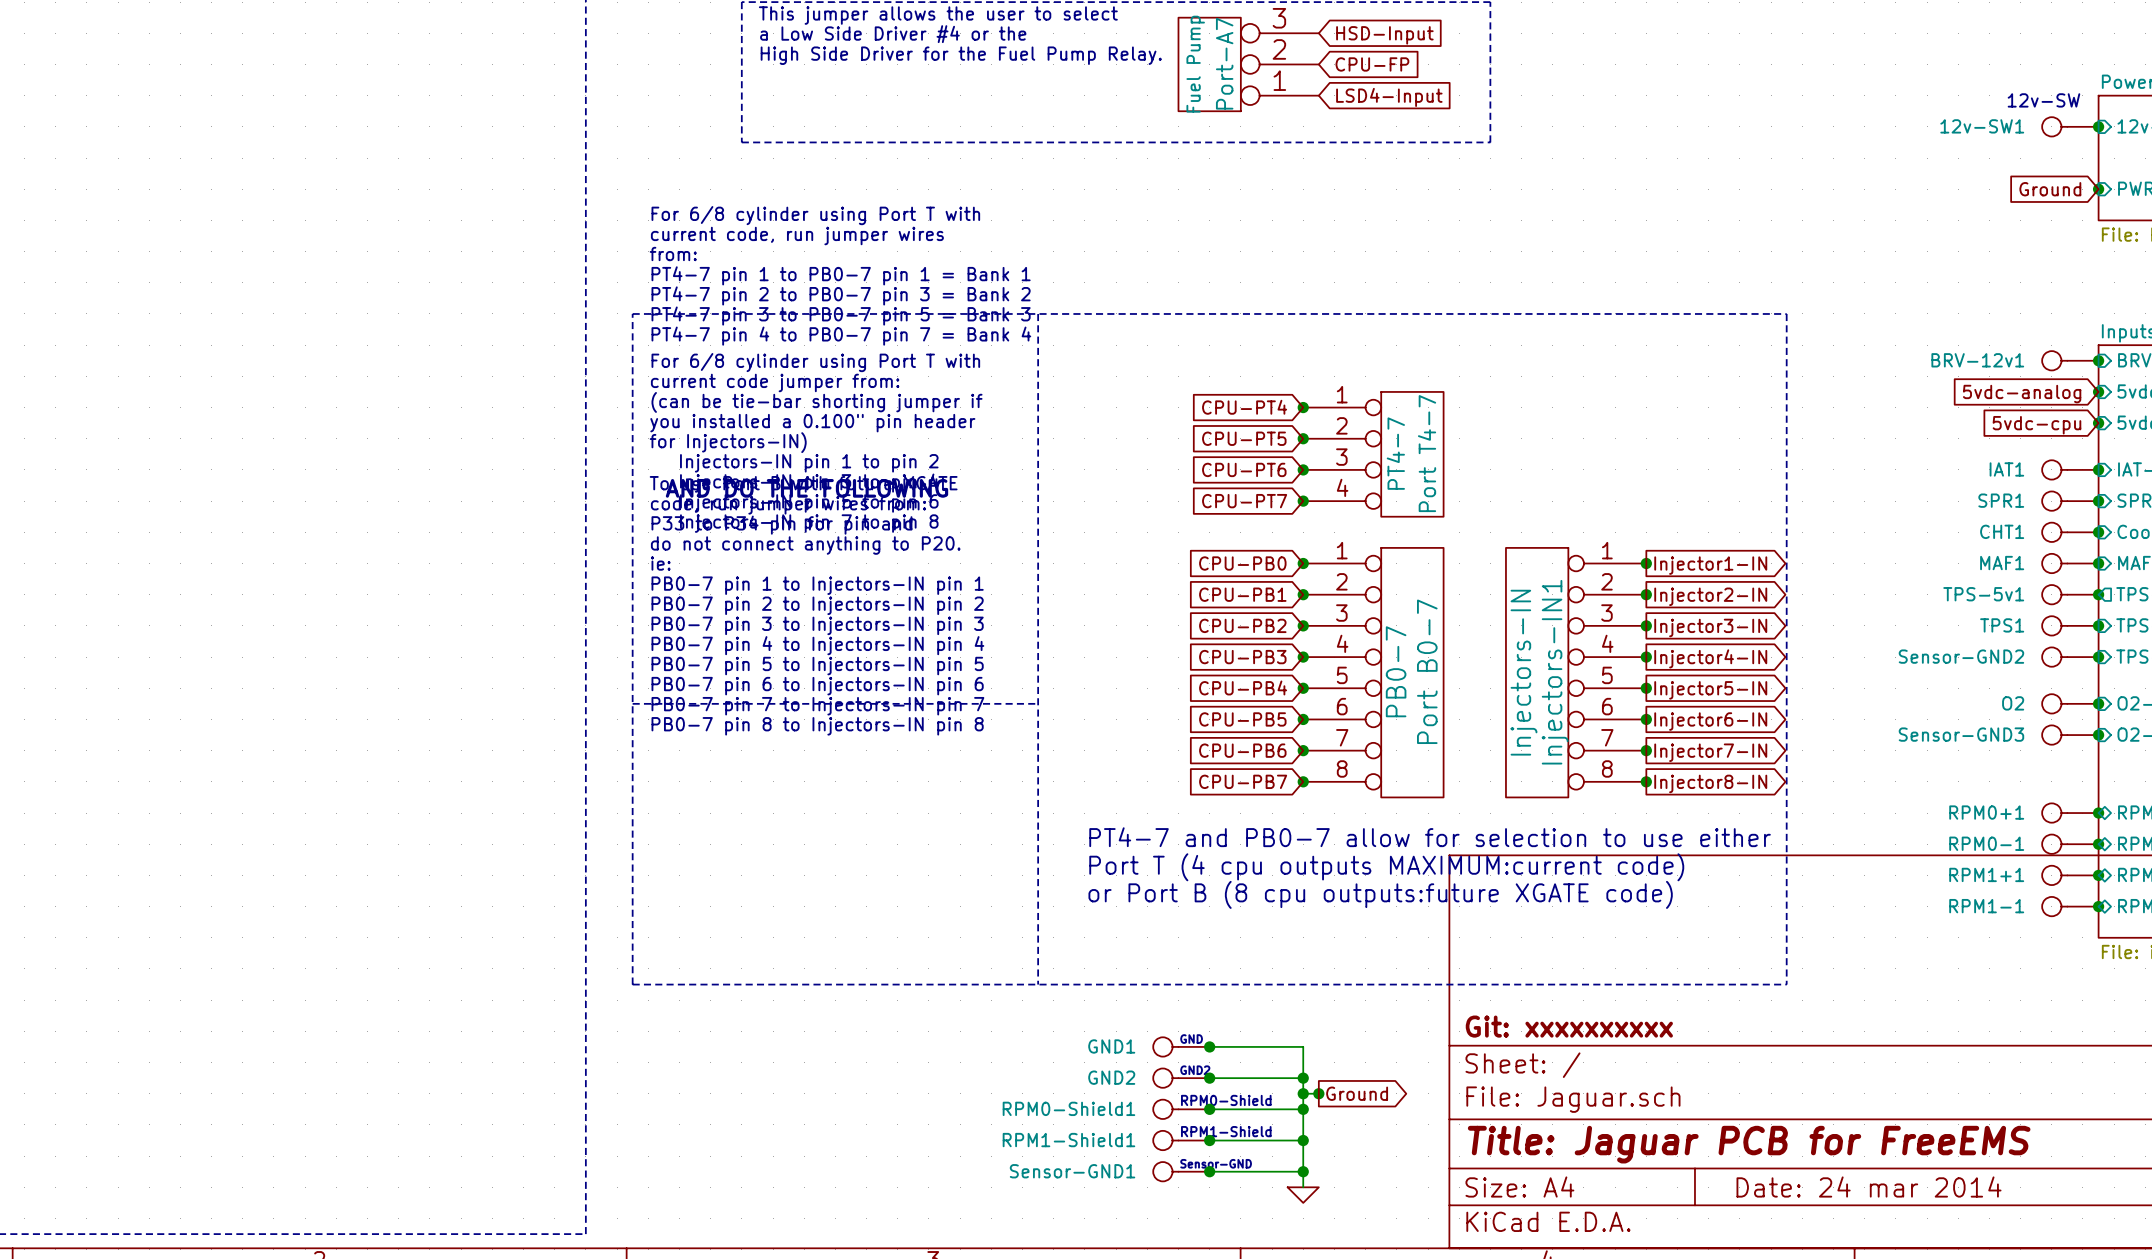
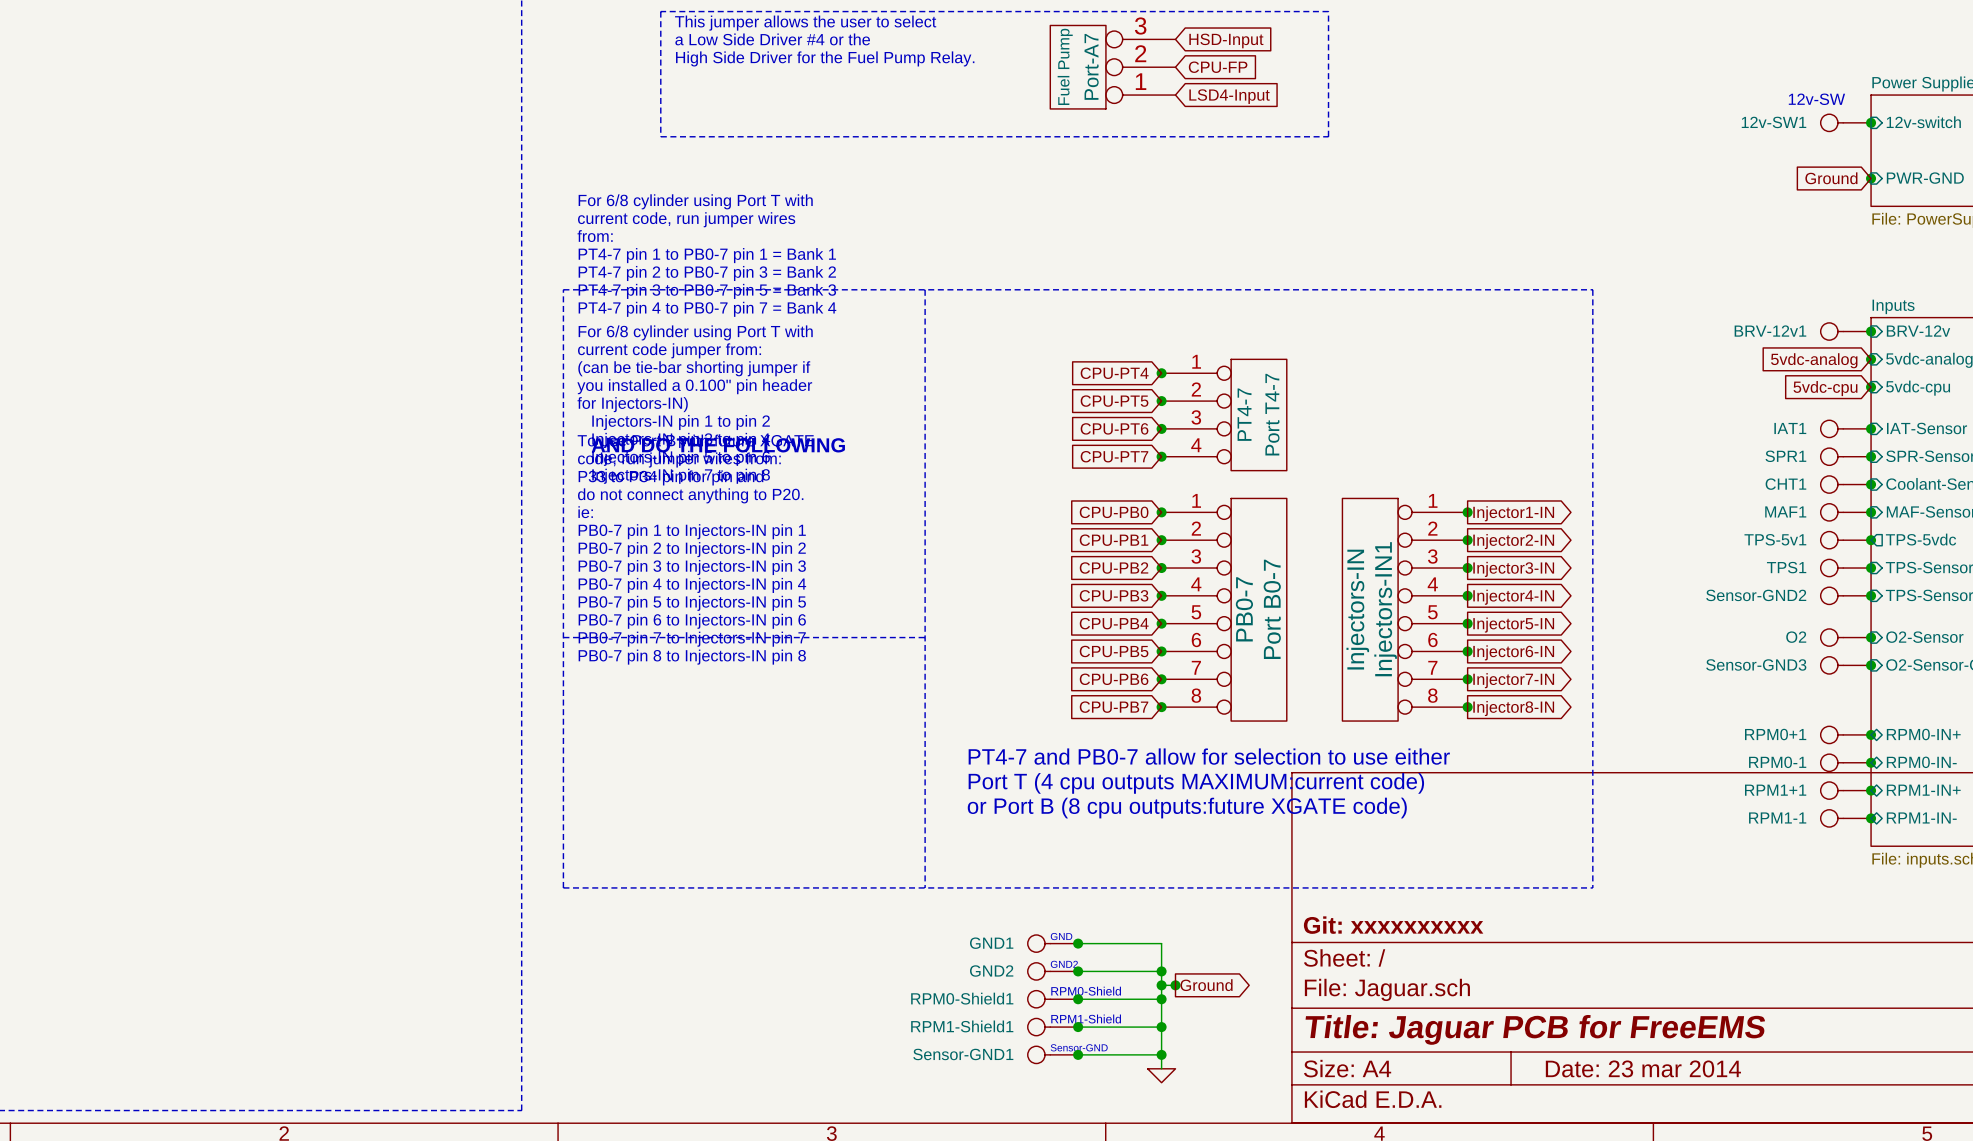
title block: Date: 24 mar 2014 (1869, 1187) -> Date: 23 mar 2014 (1643, 1068)

